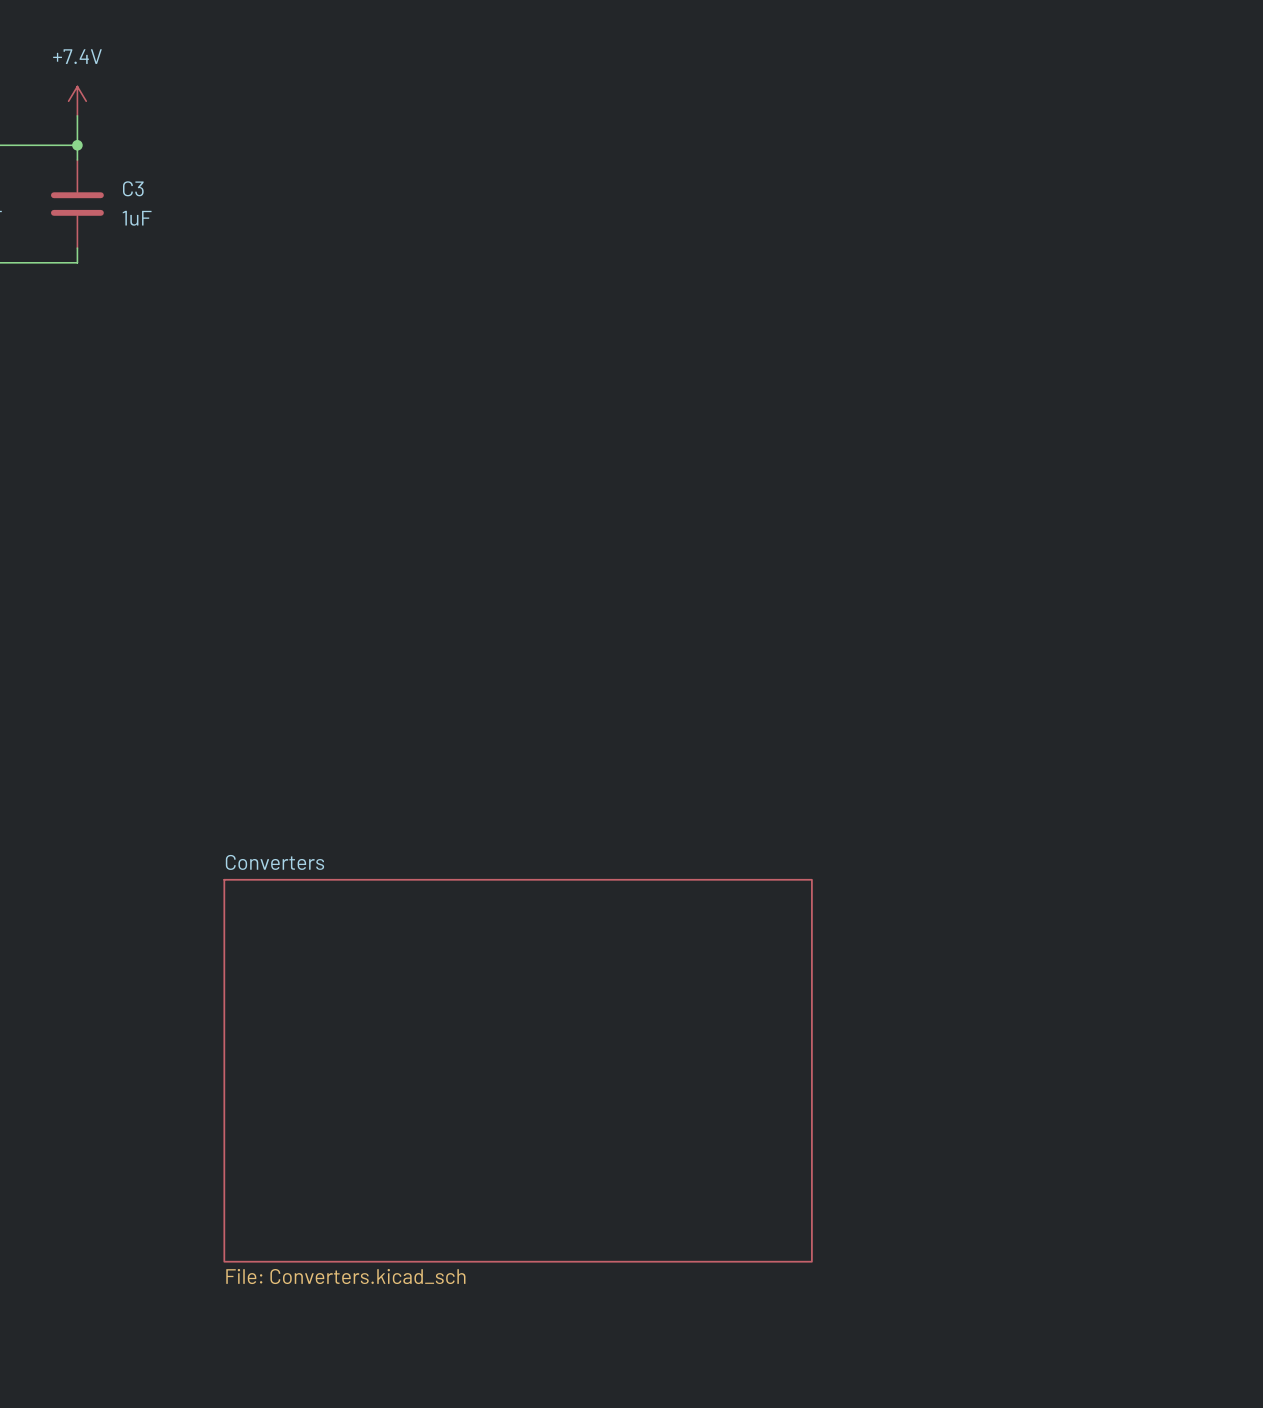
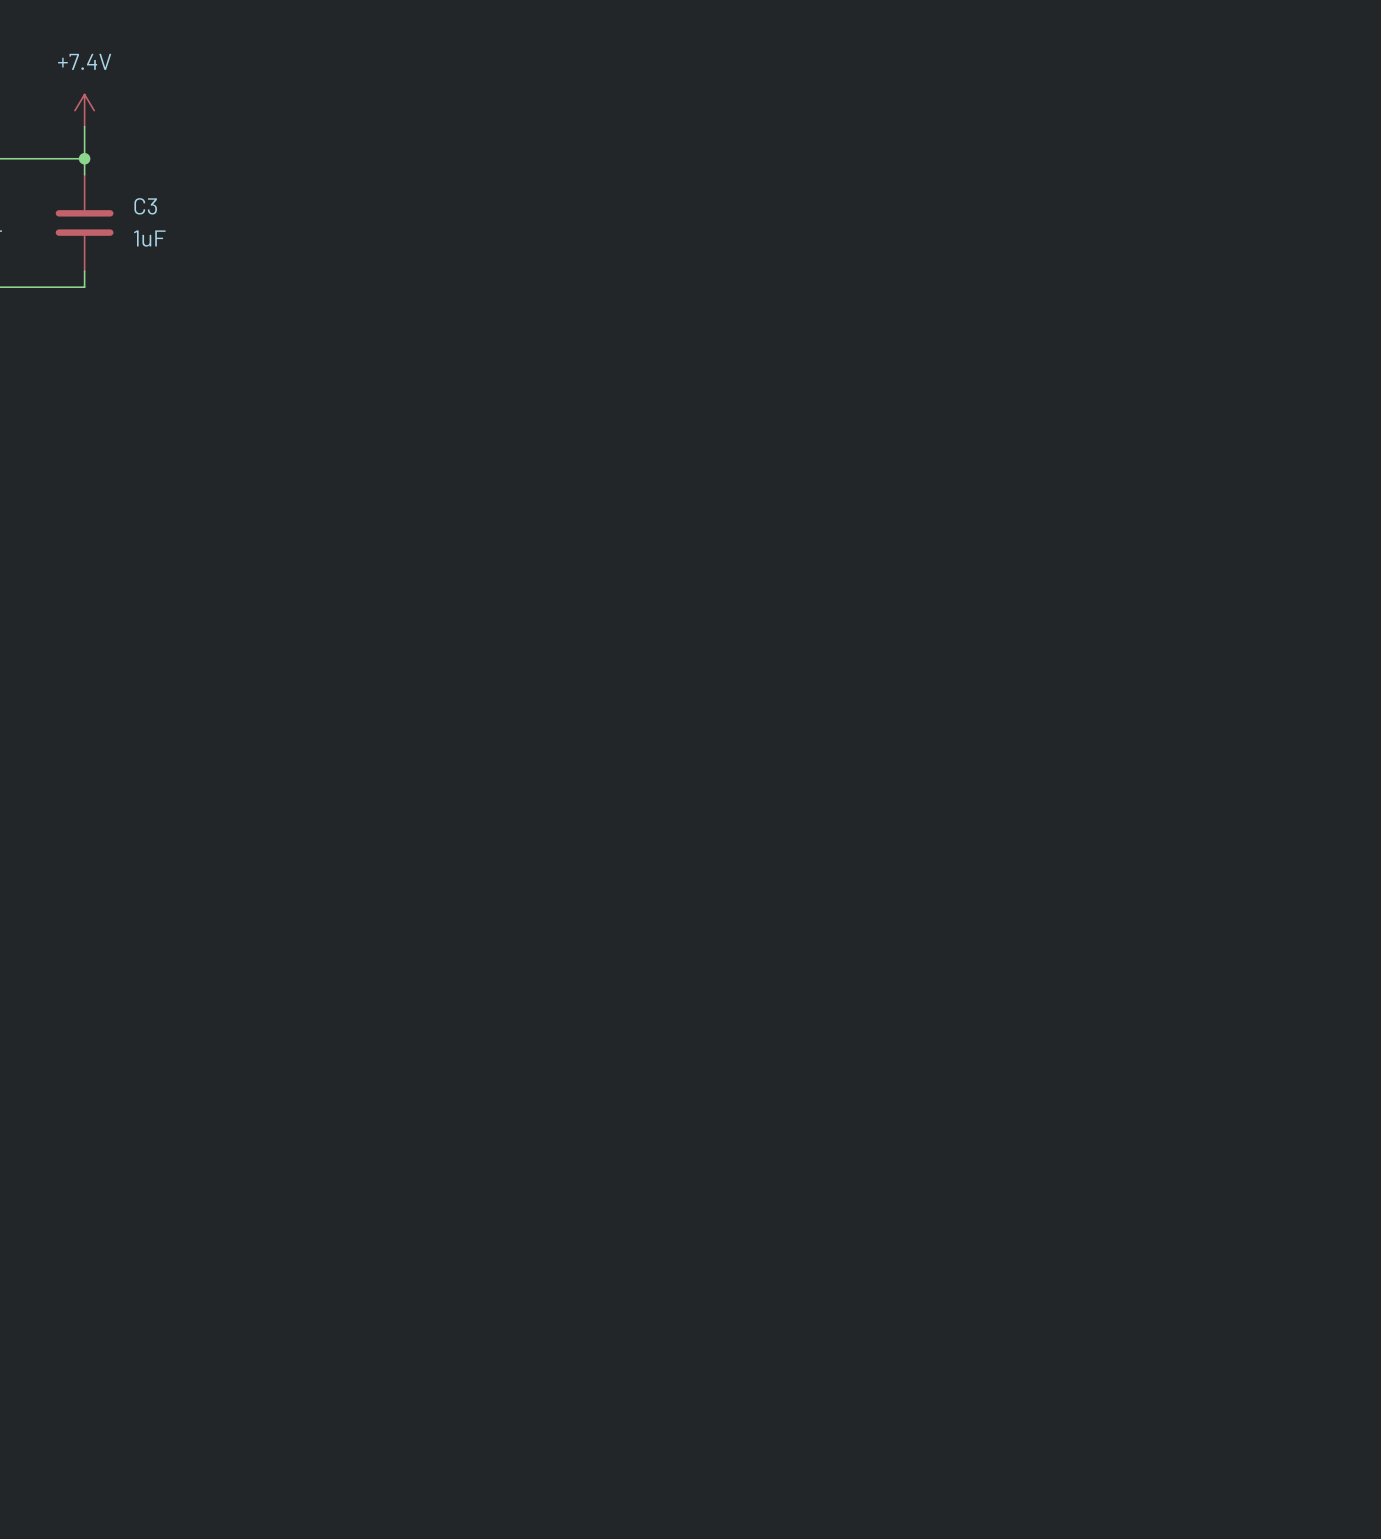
sheet Converters: File: Converters.kicad_sch (518, 1070) -> none

